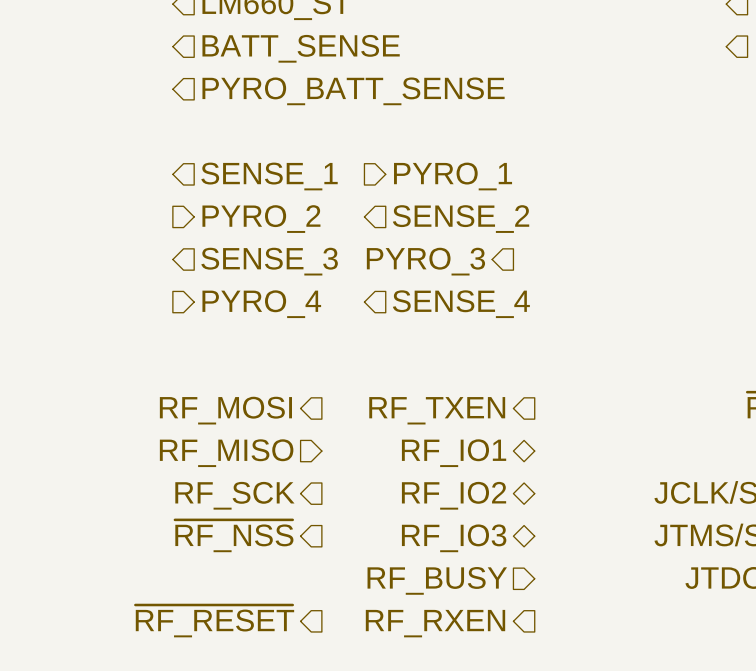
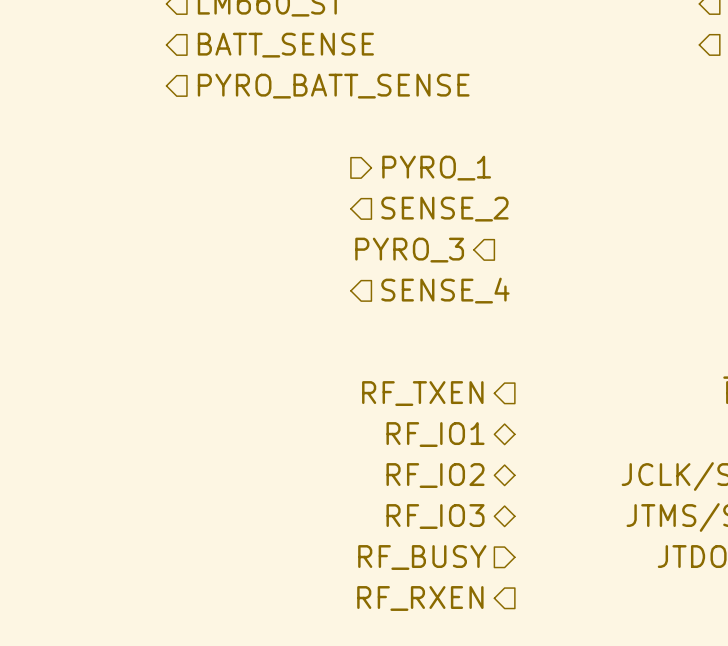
hierarchical label: SENSE_1 (269, 176) -> none
hierarchical label: PYRO_2 (261, 219) -> none
hierarchical label: SENSE_3 (269, 261) -> none
hierarchical label: PYRO_4 (261, 304) -> none
hierarchical label: RF_MOSI (225, 410) -> none
hierarchical label: RF_MISO (226, 453) -> none
hierarchical label: RF_SCK (234, 495) -> none
hierarchical label: ~{RF_NSS} (234, 536) -> none
hierarchical label: ~{RF_RESET} (214, 621) -> none

